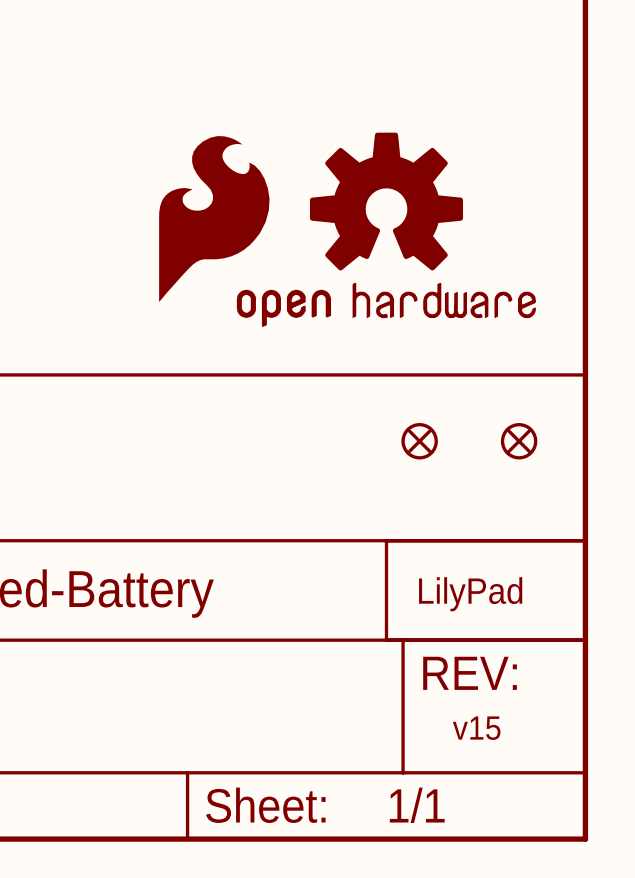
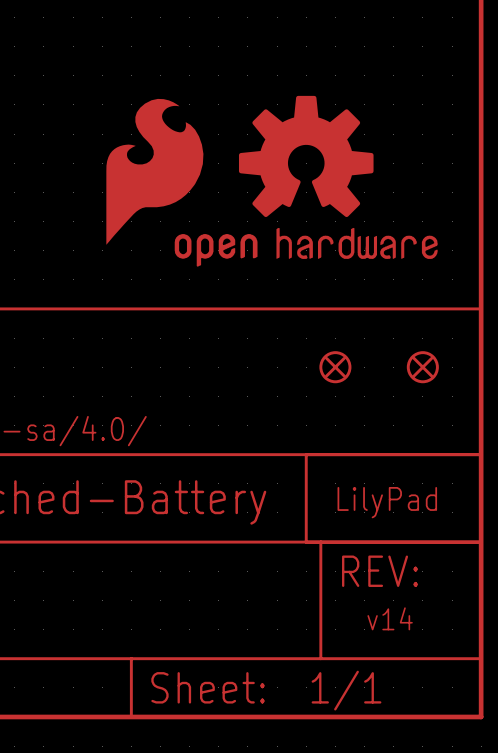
text: v15 (476, 728) -> v14 (390, 618)

